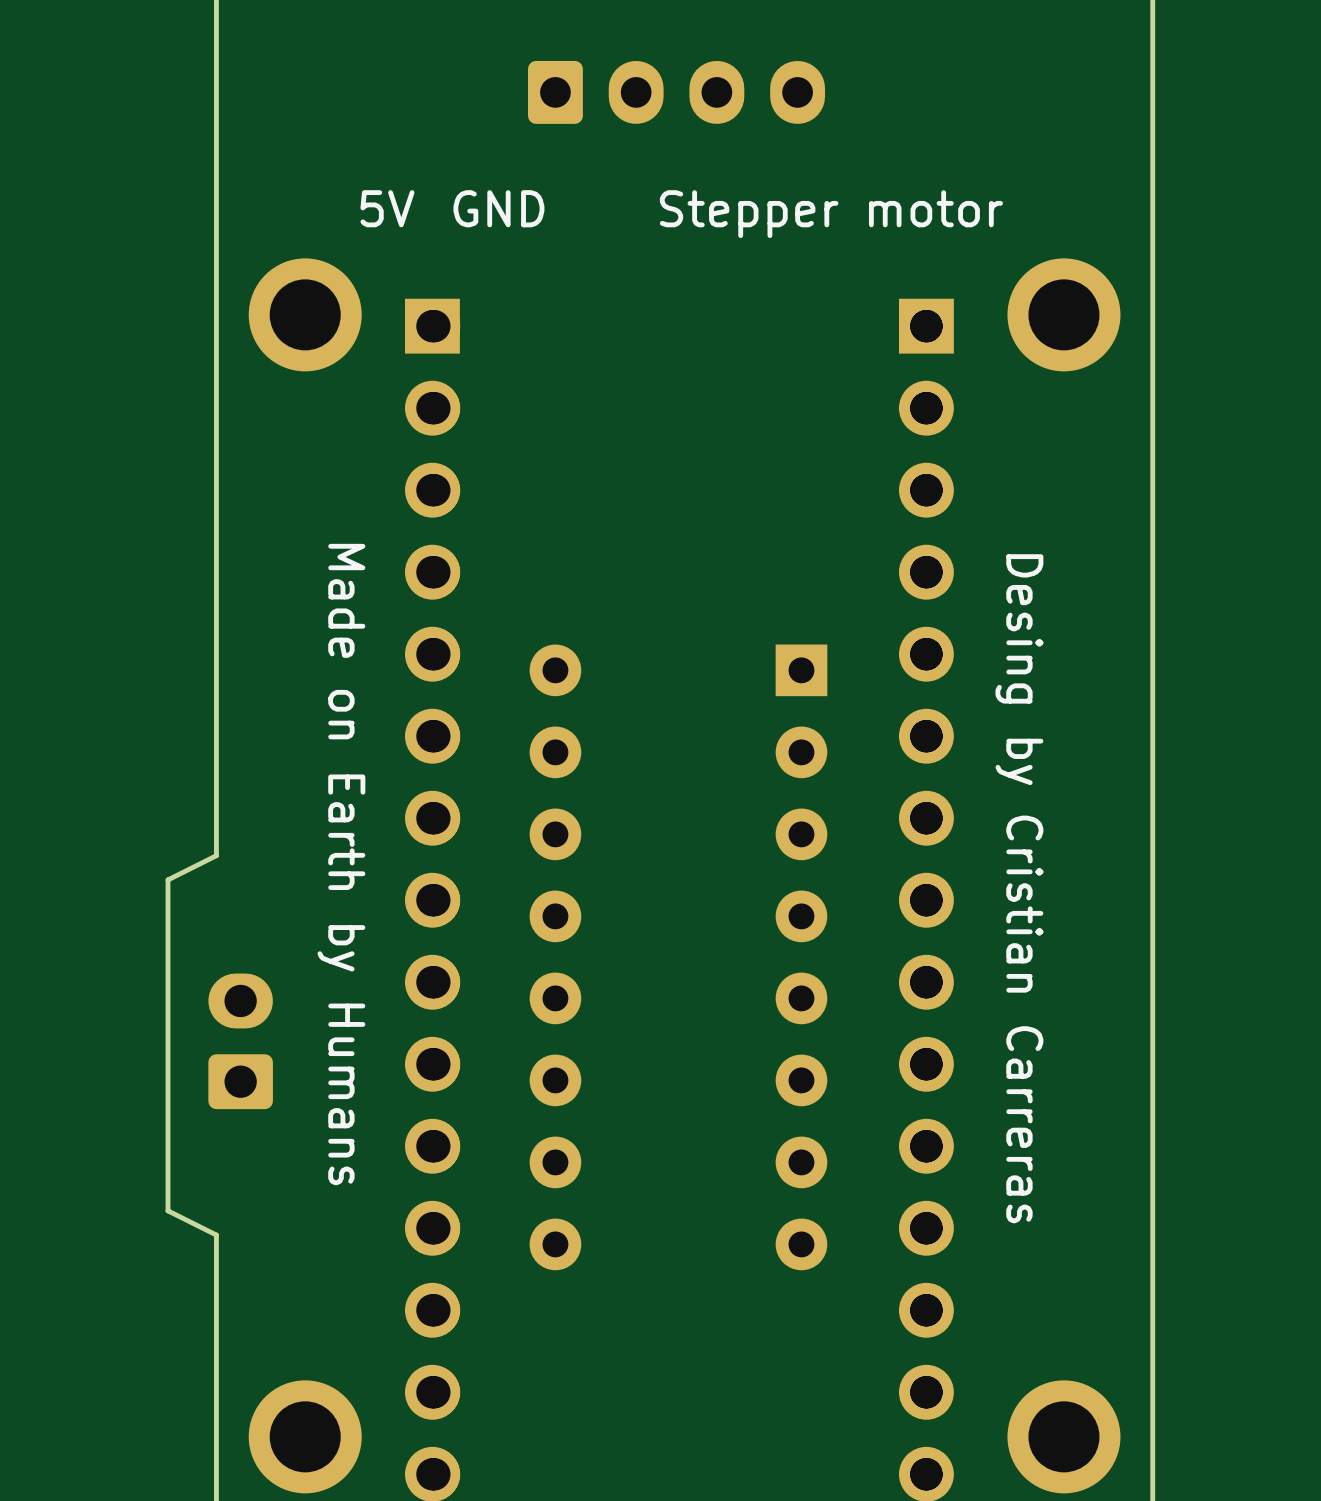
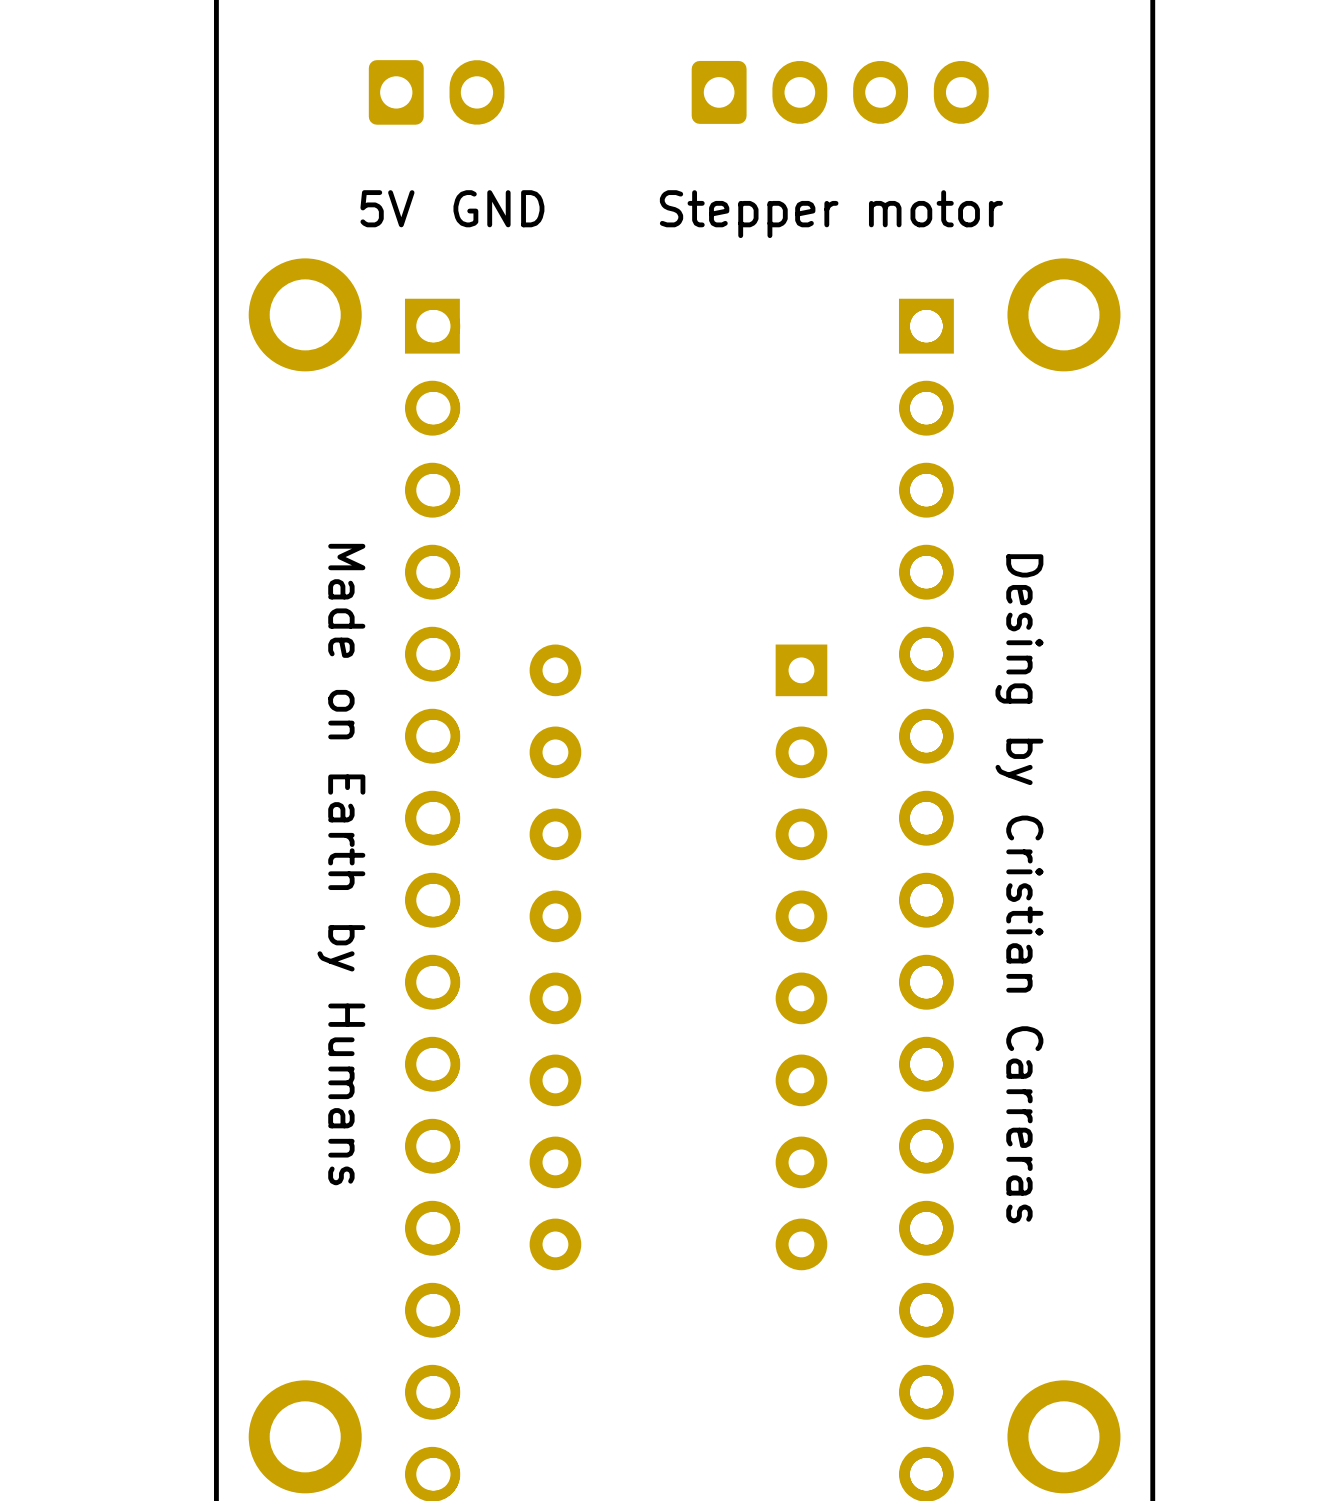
part: none -> (436, 92)
part position: (676, 92) -> (840, 92)
board edge: (216, 855) (167, 879) (167, 1210) (216, 1235) -> (216, 855) (216, 1235)
part: (240, 1041) -> none

